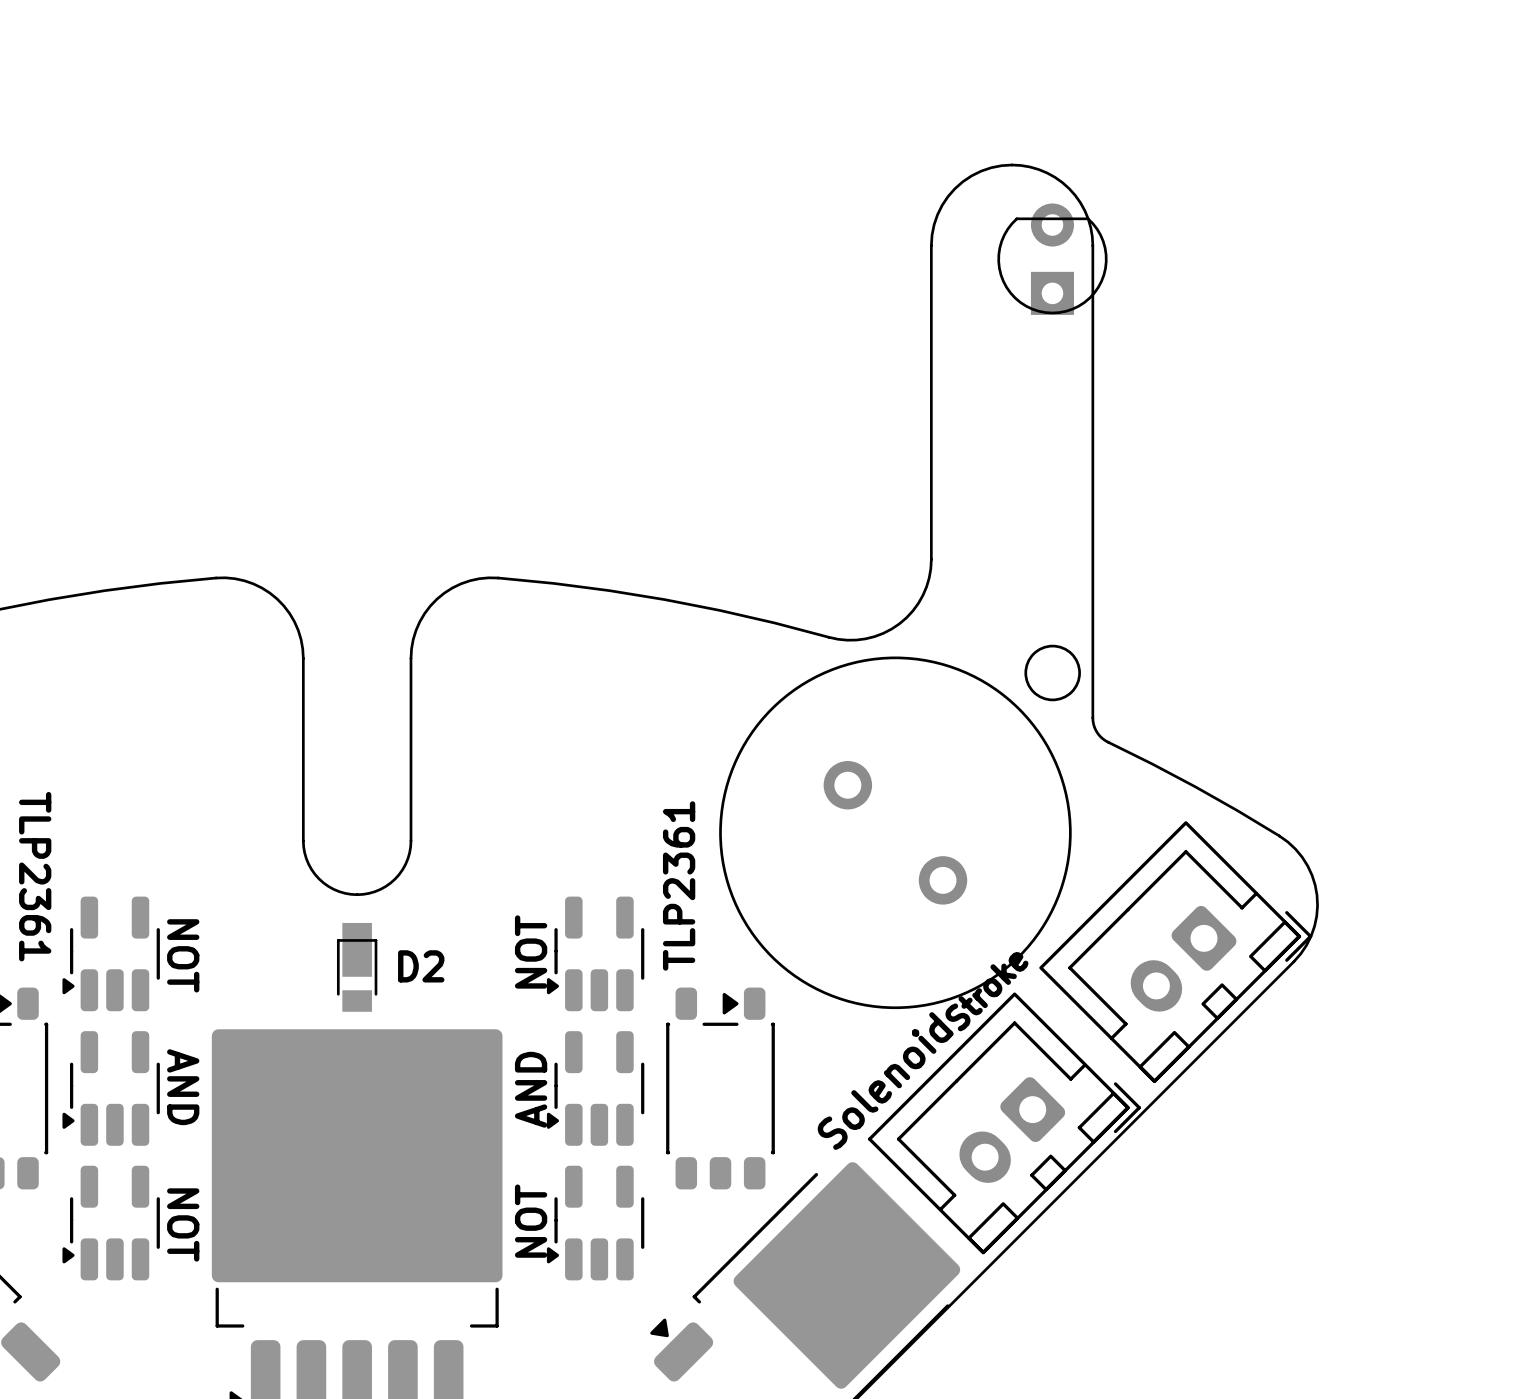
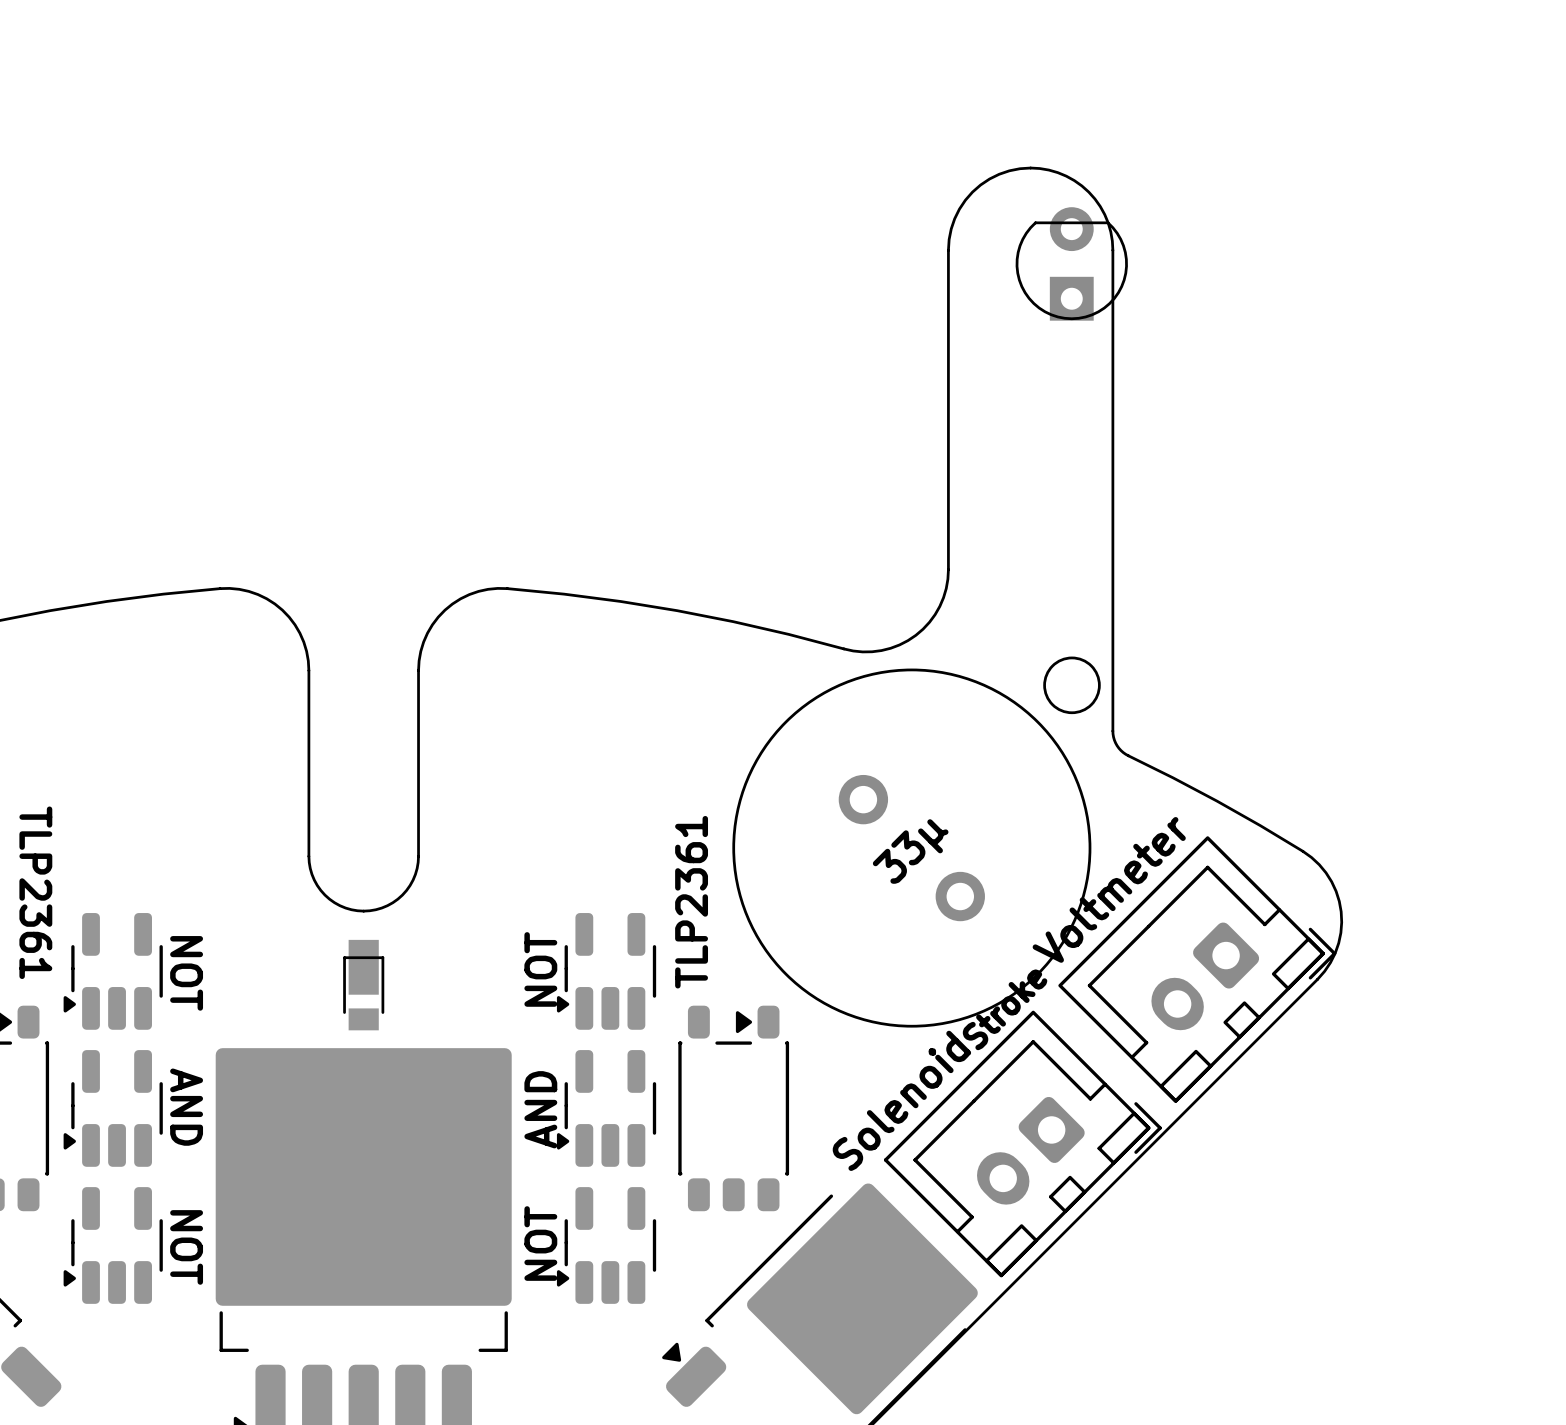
part value: none -> 33μ (910, 851)
part value: none -> Voltmeter (1109, 889)
part value: D2 (421, 966) -> none

